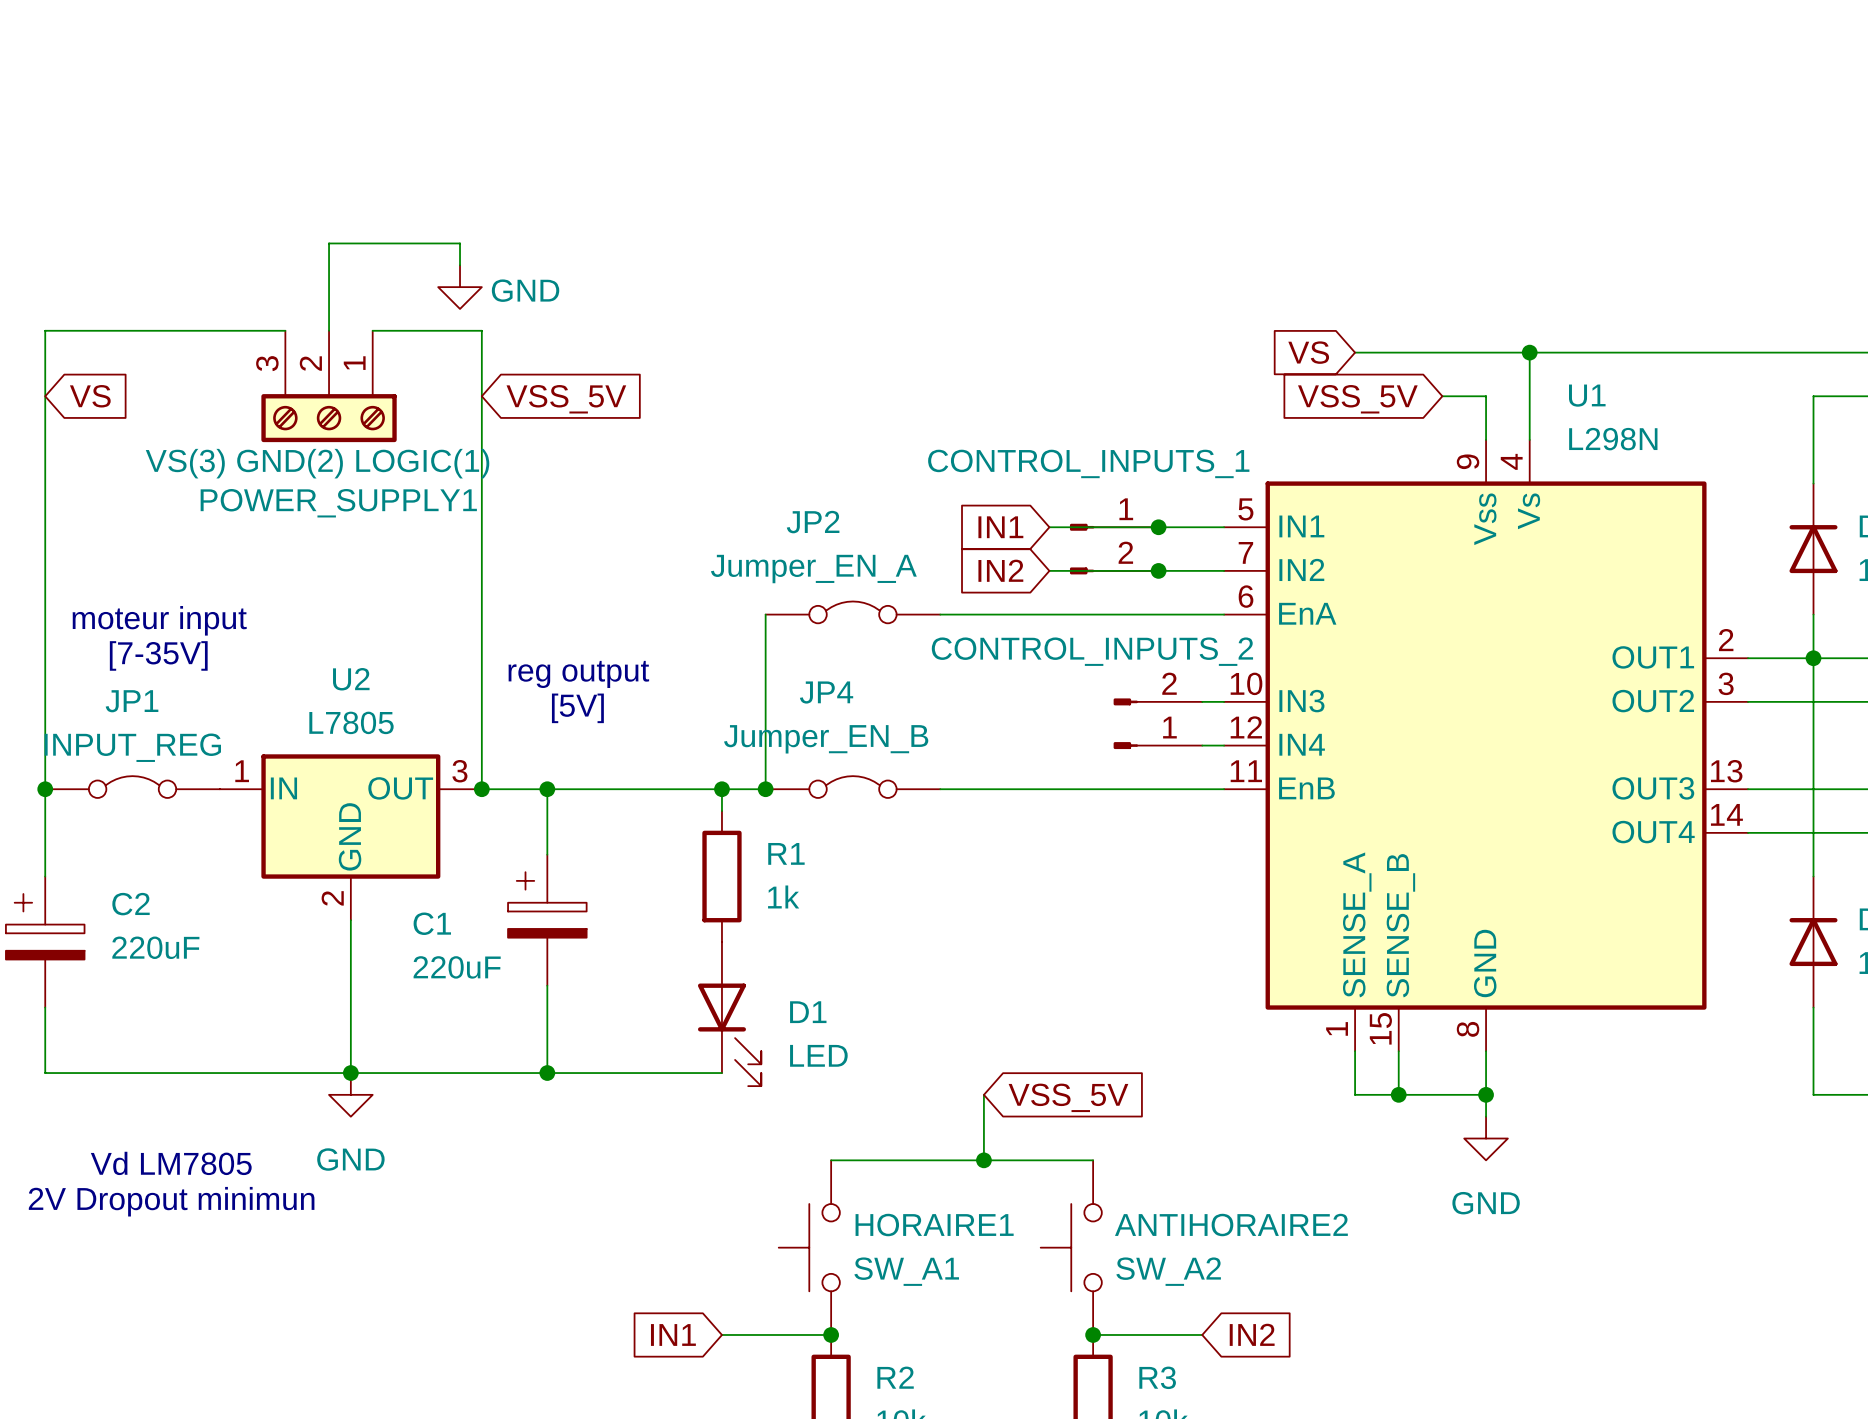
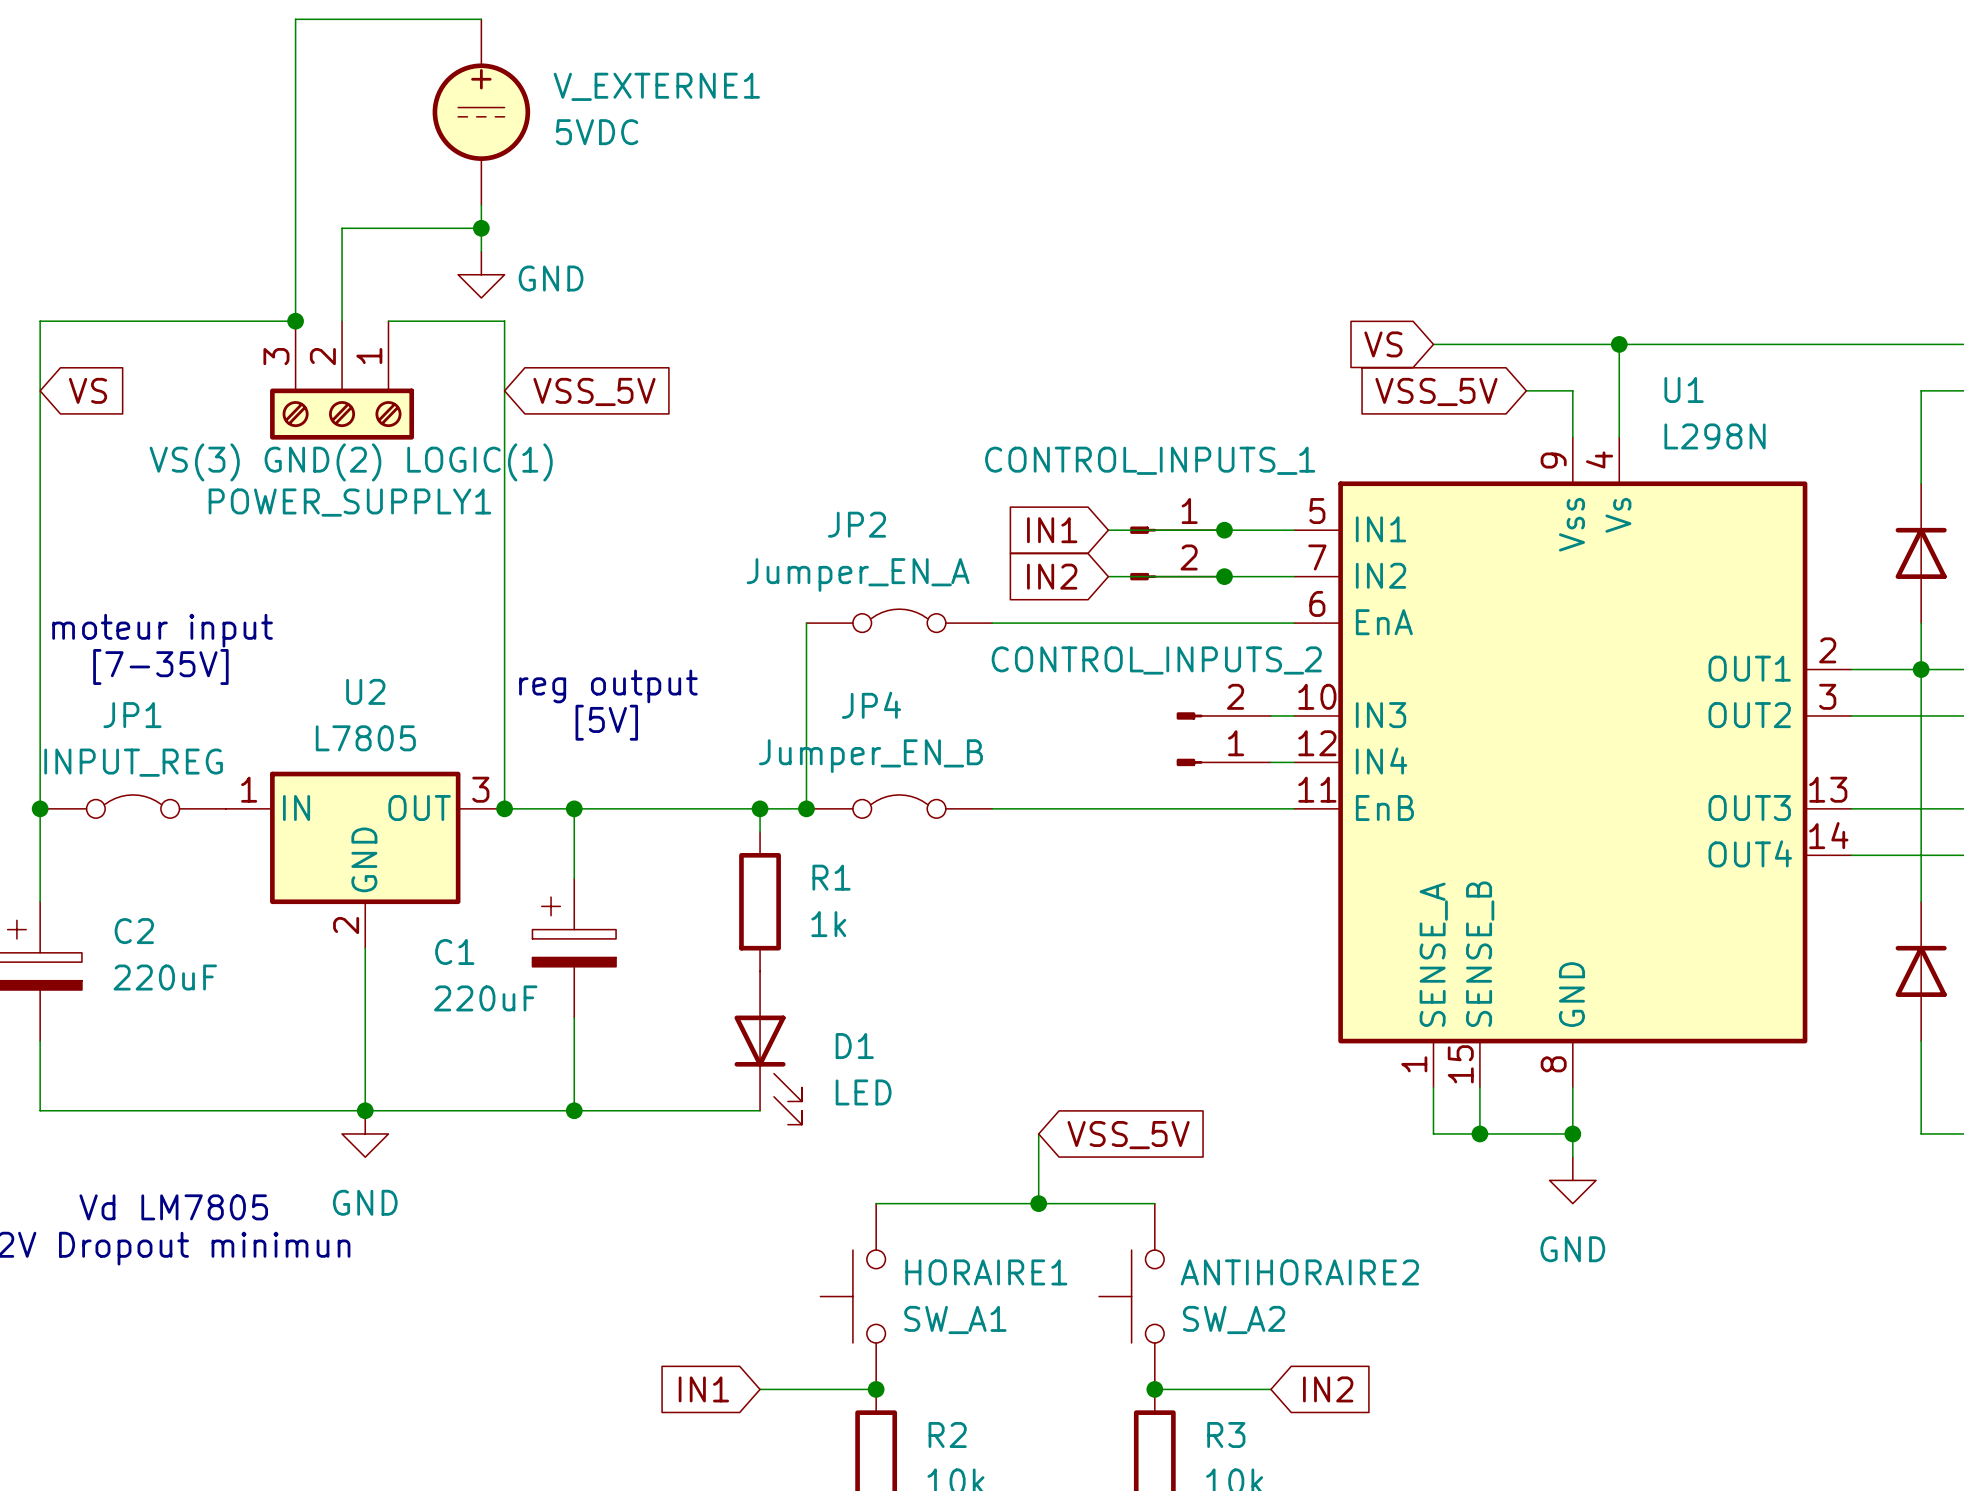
wire: none -> (481, 19) (295, 19) (295, 321)
V_EXTERNE1: none -> 5VDC (481, 112)
wire: none -> (481, 205) (481, 228)
junction: none -> (481, 228)
junction: none -> (295, 321)

